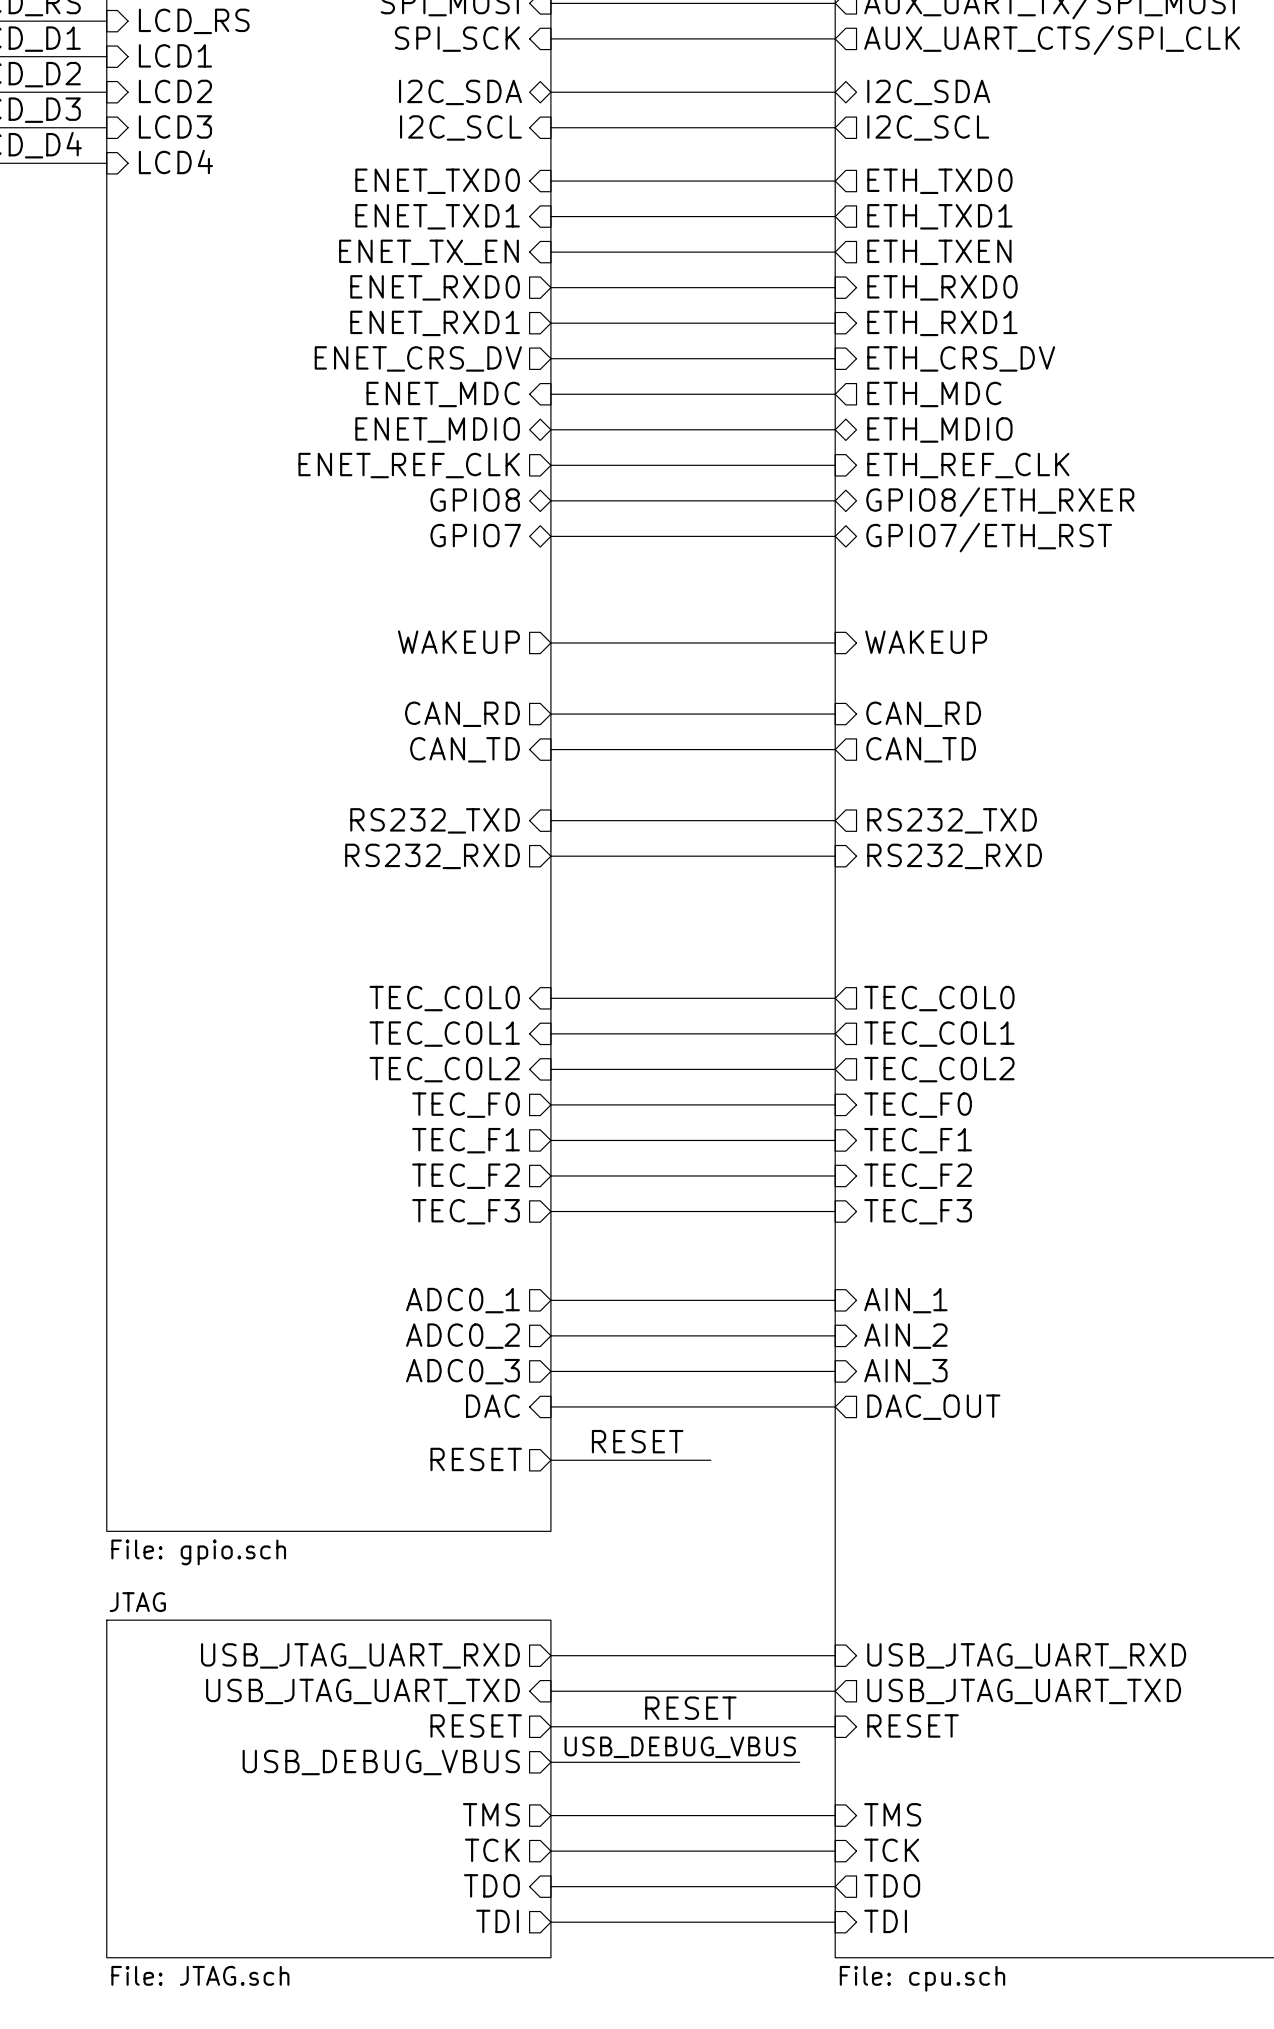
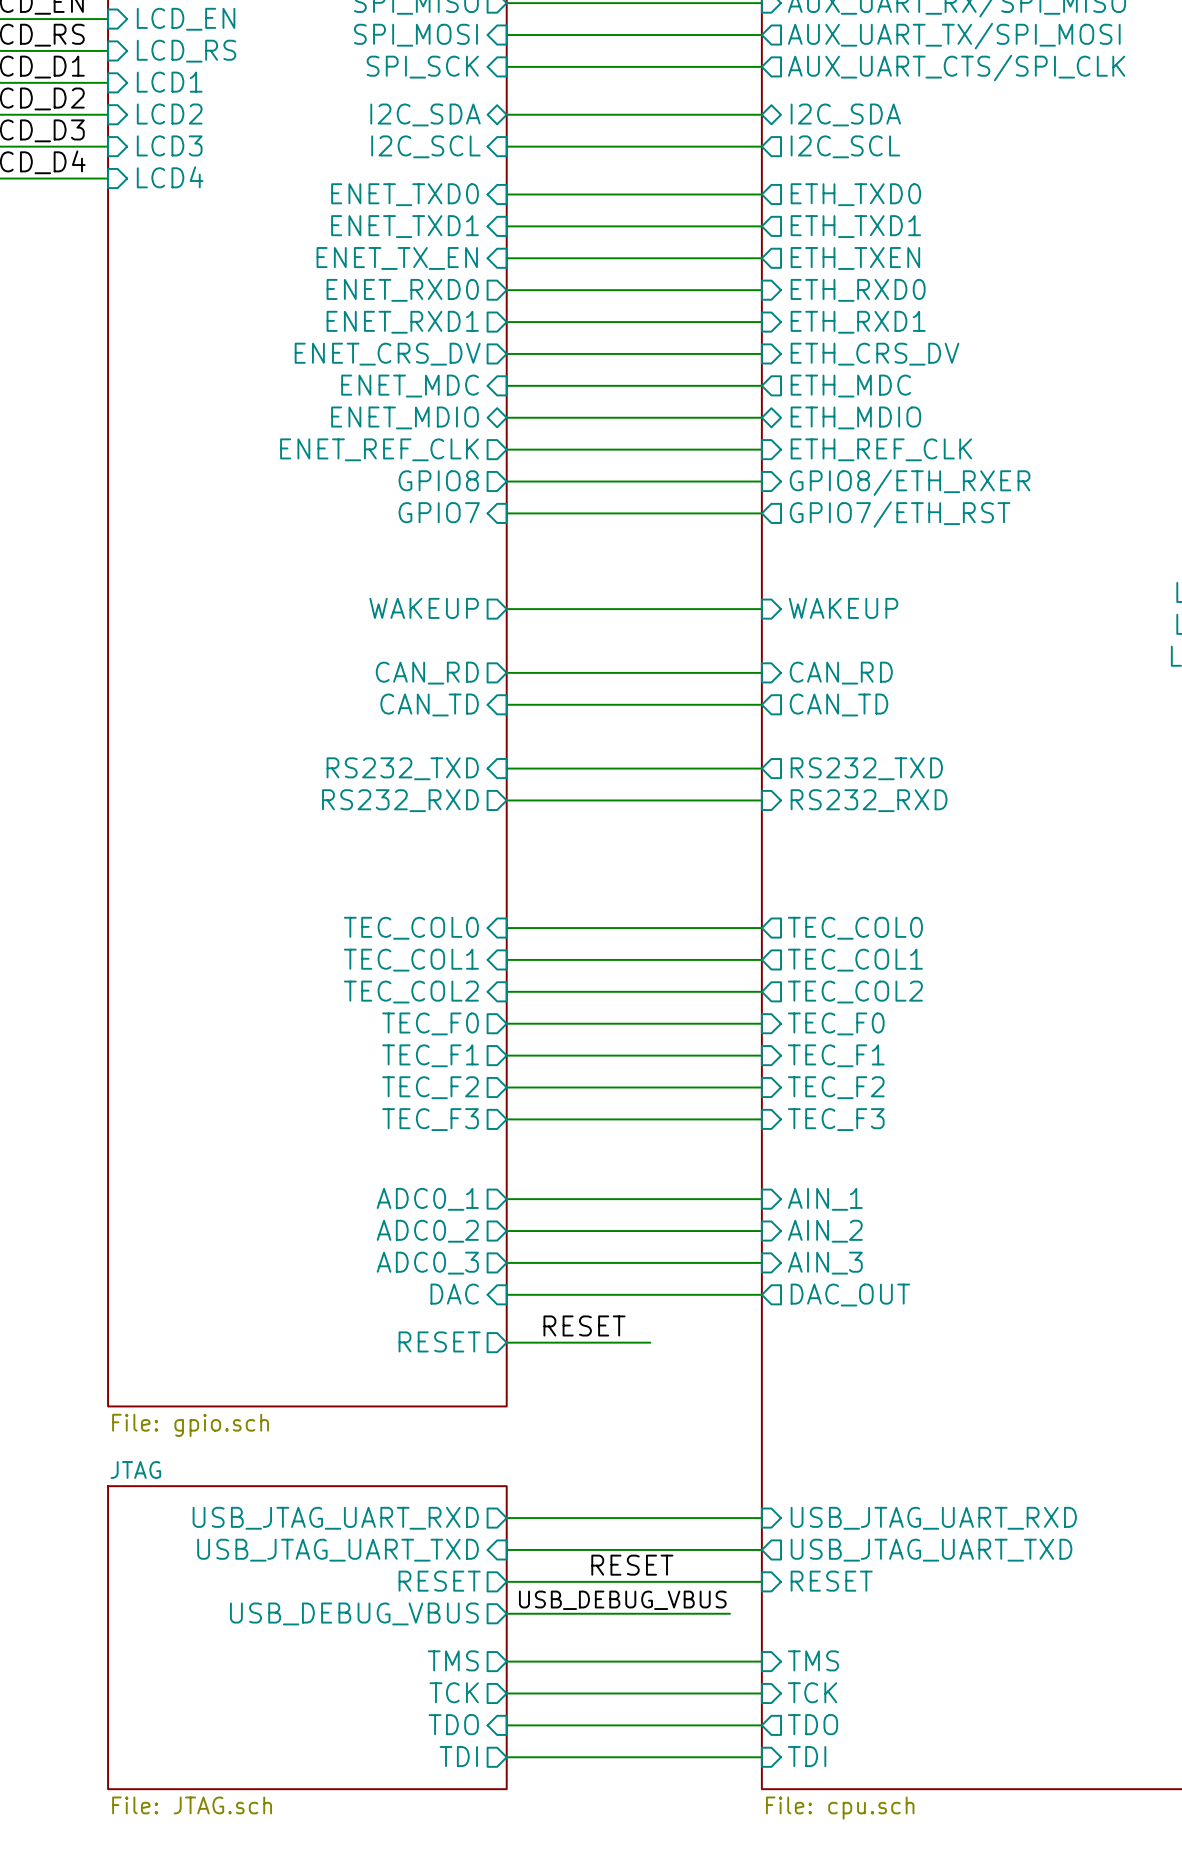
sheet pin shape: bidirectional (475, 500) -> output (438, 480)
sheet pin shape: bidirectional (1000, 502) -> input (910, 482)
sheet pin shape: bidirectional (475, 535) -> input (439, 512)
sheet pin shape: bidirectional (989, 537) -> output (900, 514)

